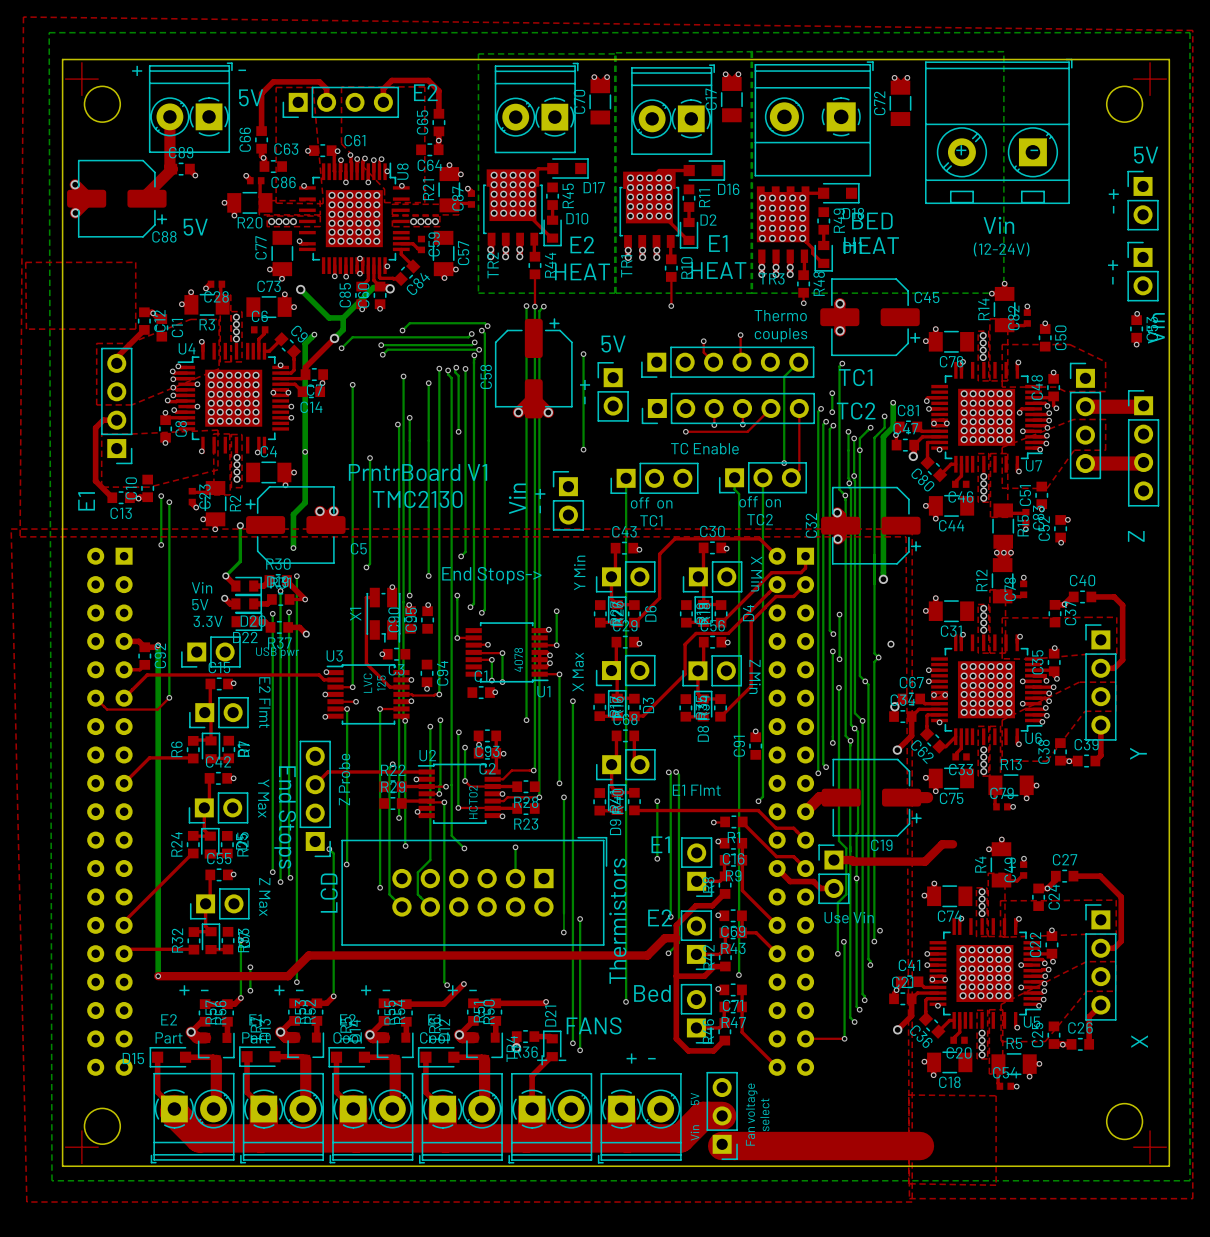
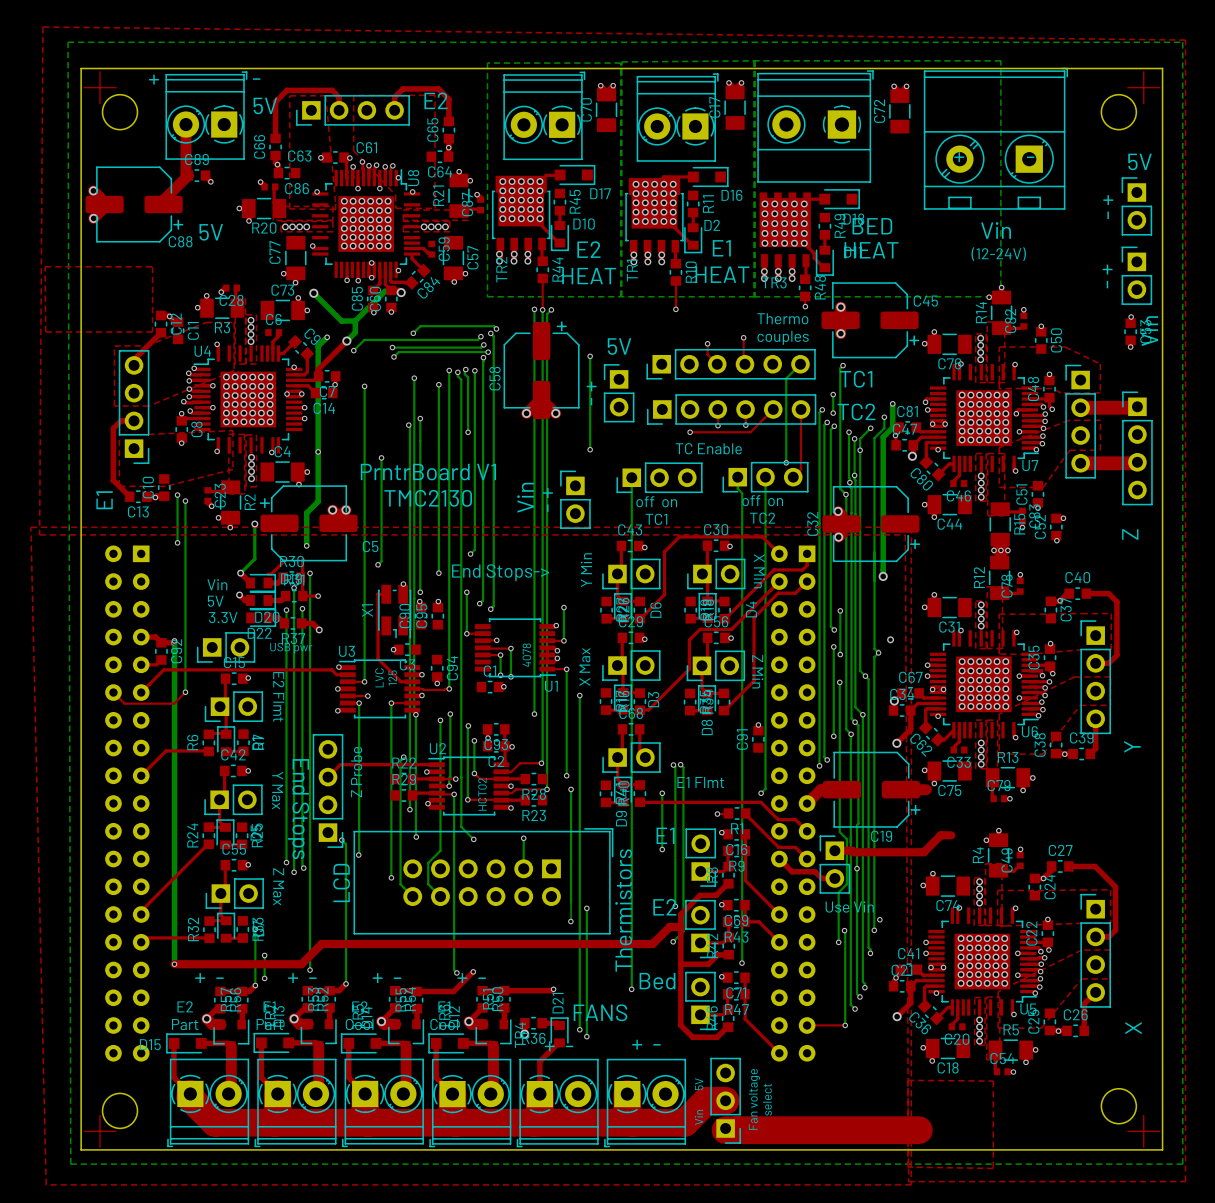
top track: none -> (285, 560) (271, 574) (267, 574)
top track: none -> (303, 560) (302, 595)
top track: (287, 580) (305, 599) -> none

